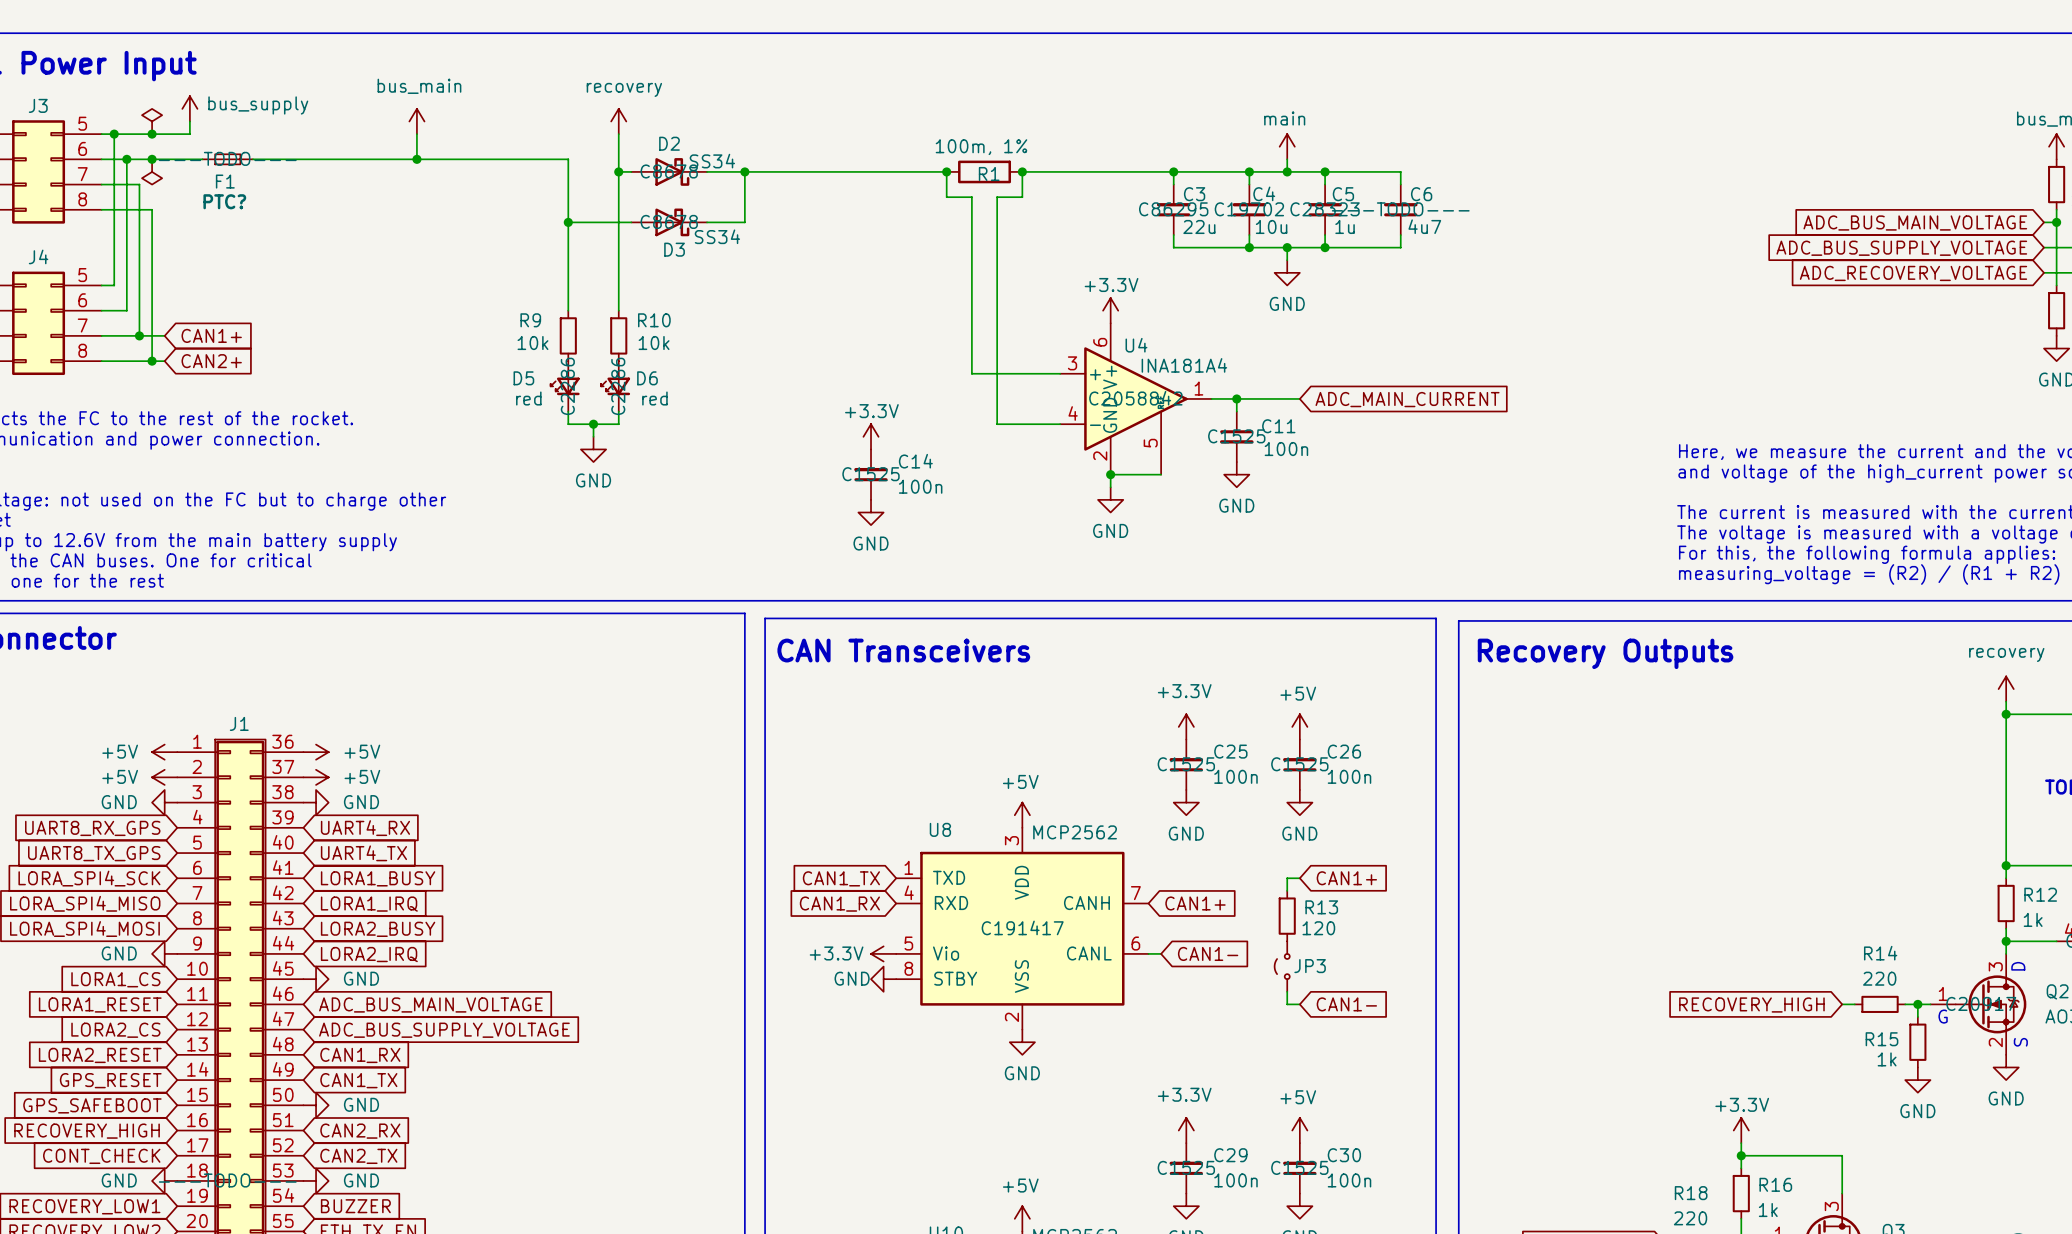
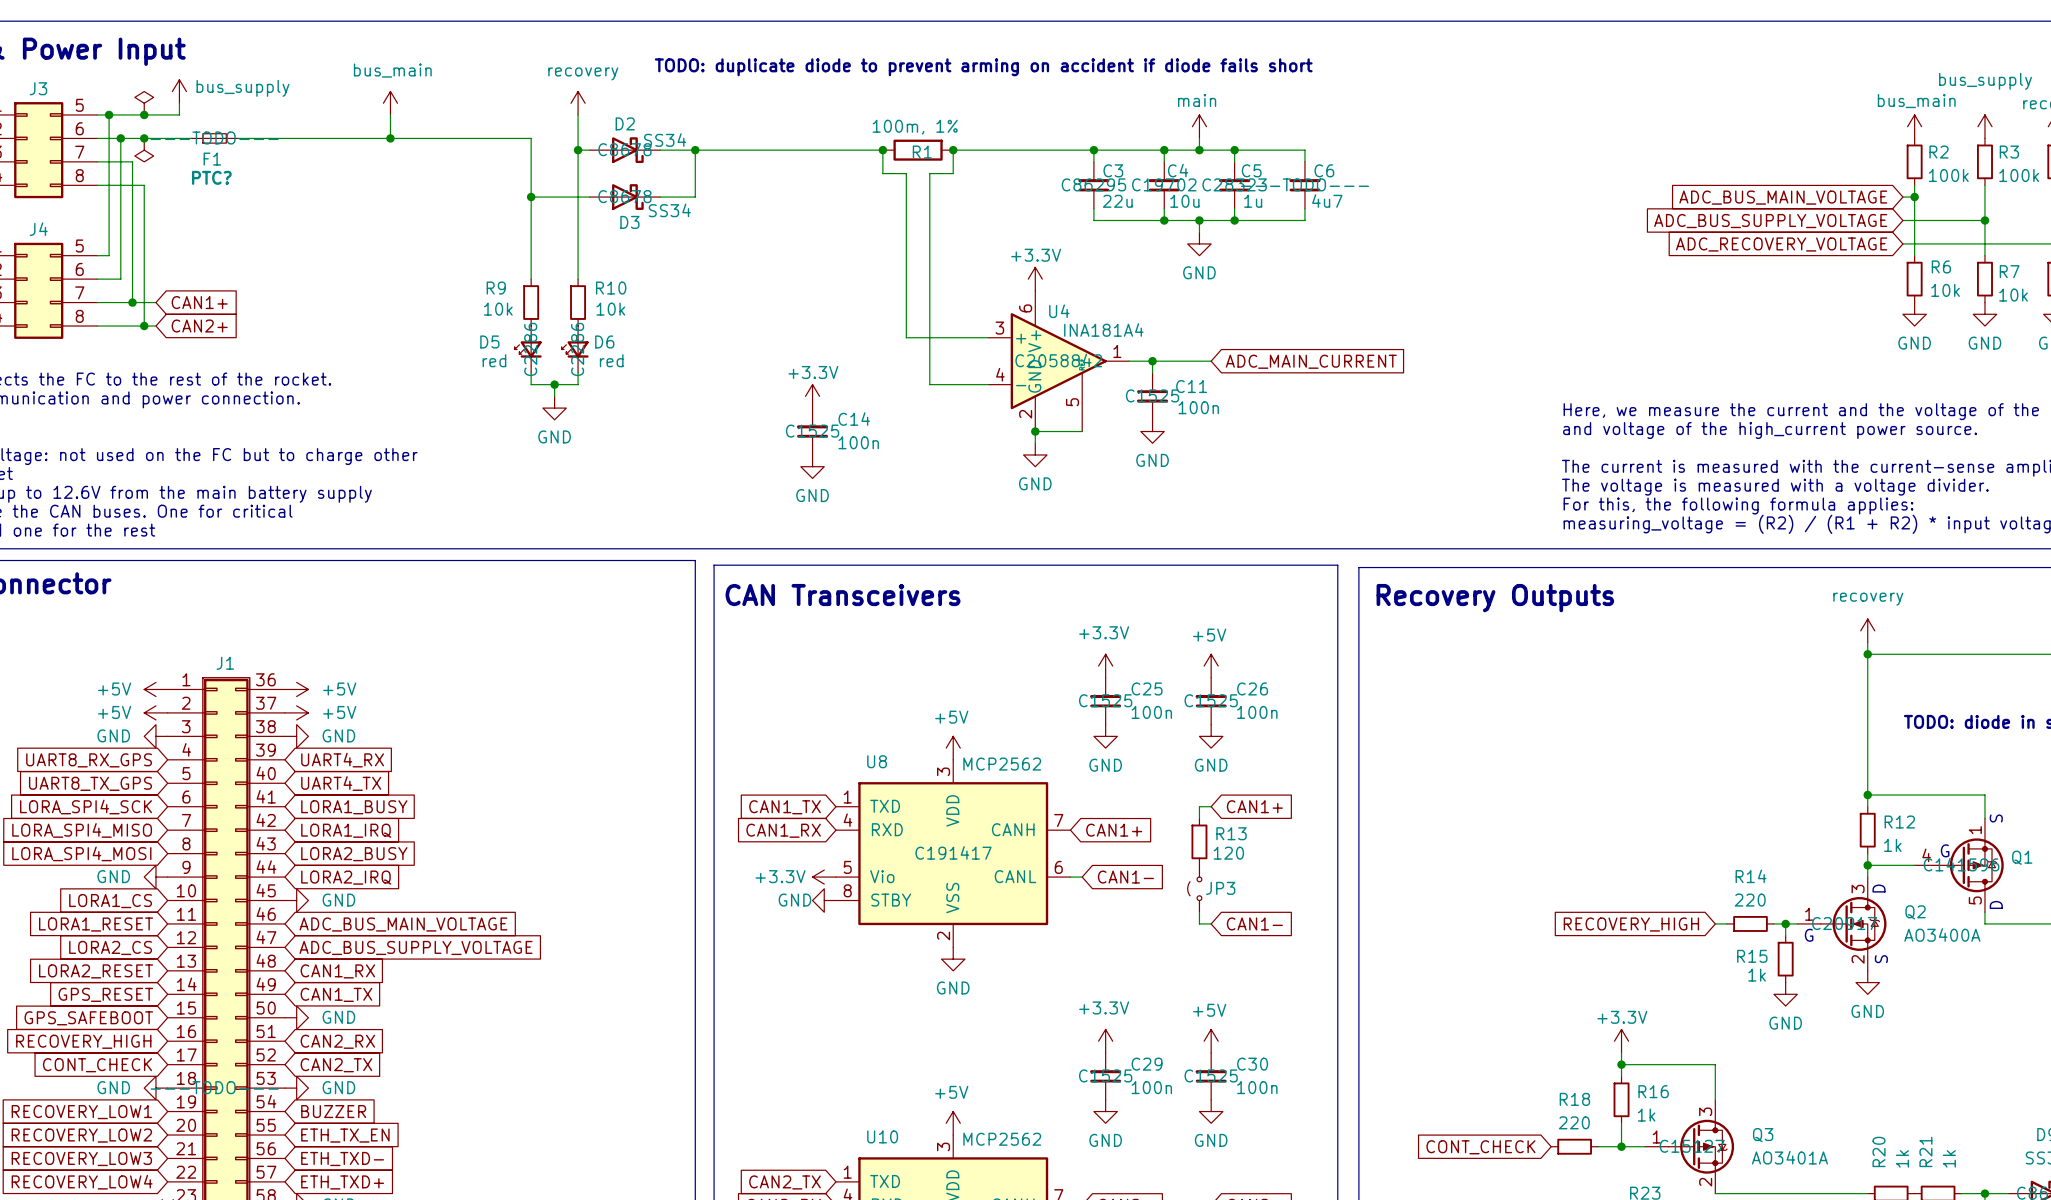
text: none -> TODO: duplicate diode to prevent arming on accident if diode fails short (983, 67)

